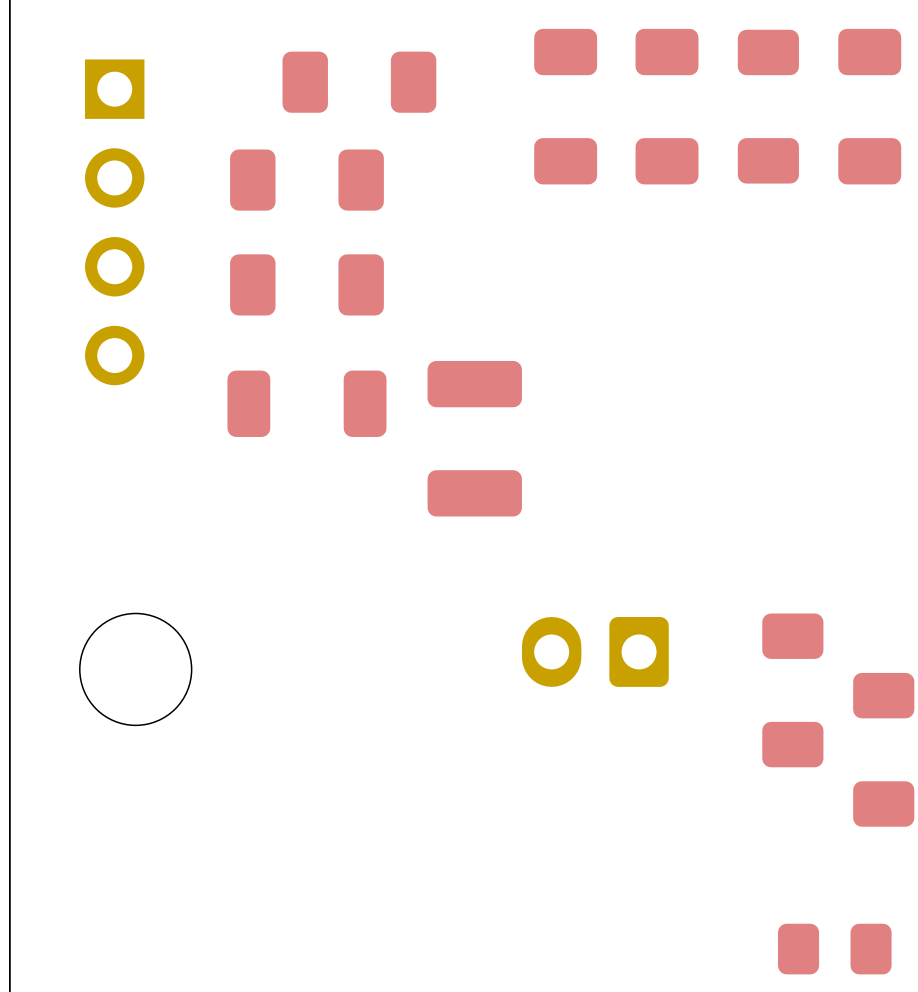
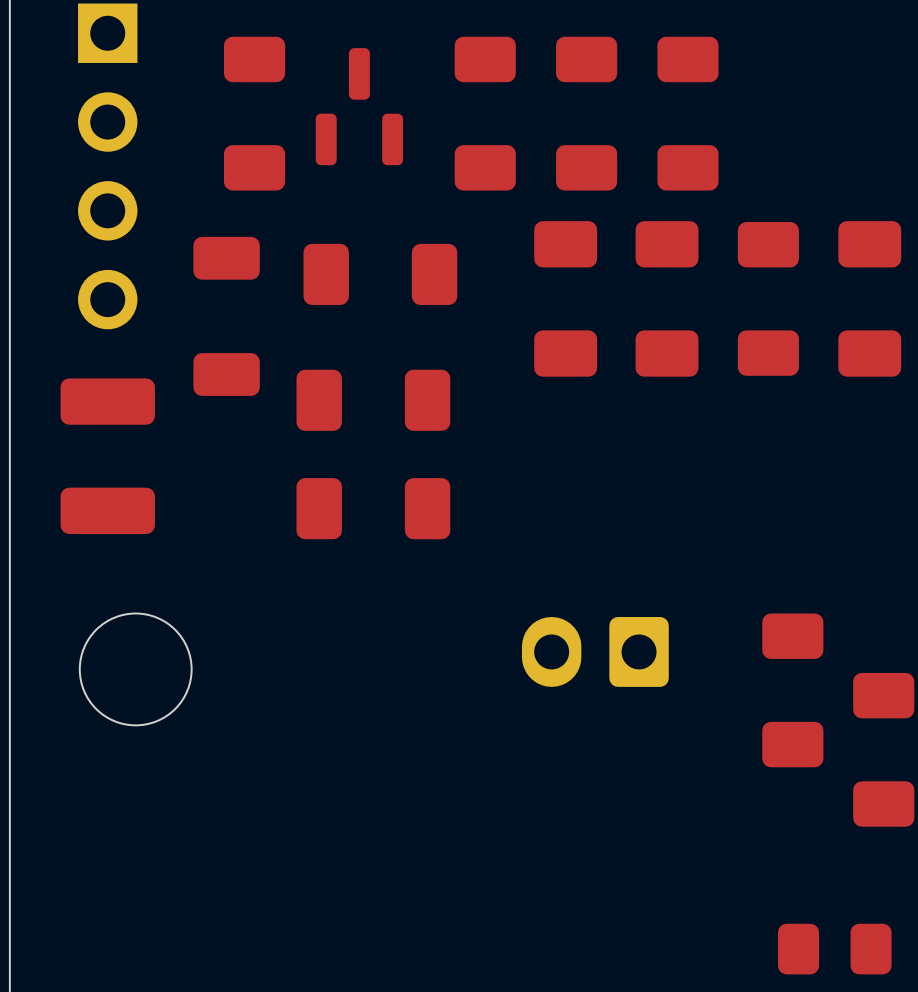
part footprint: [534, 28, 598, 185] -> [556, 36, 618, 191]
part footprint: [635, 28, 699, 185] -> [657, 36, 719, 191]
part footprint: [282, 51, 437, 113] -> [315, 48, 404, 166]
part: (768, 106) -> none
part: (869, 106) -> none
part: none -> (254, 113)
part: none -> (485, 113)
part: (306, 180) -> none
part position: (114, 222) -> (107, 166)
part: none -> (380, 274)
part: (306, 284) -> none
part: none -> (565, 298)
part: none -> (667, 298)
part: none -> (768, 298)
part: none -> (869, 298)
part: none -> (373, 400)
part rotation: 0° (306, 403) -> 90° clockwise (226, 316)
part position: (306, 403) -> (226, 316)
part position: (474, 438) -> (107, 456)
part: none -> (373, 508)

